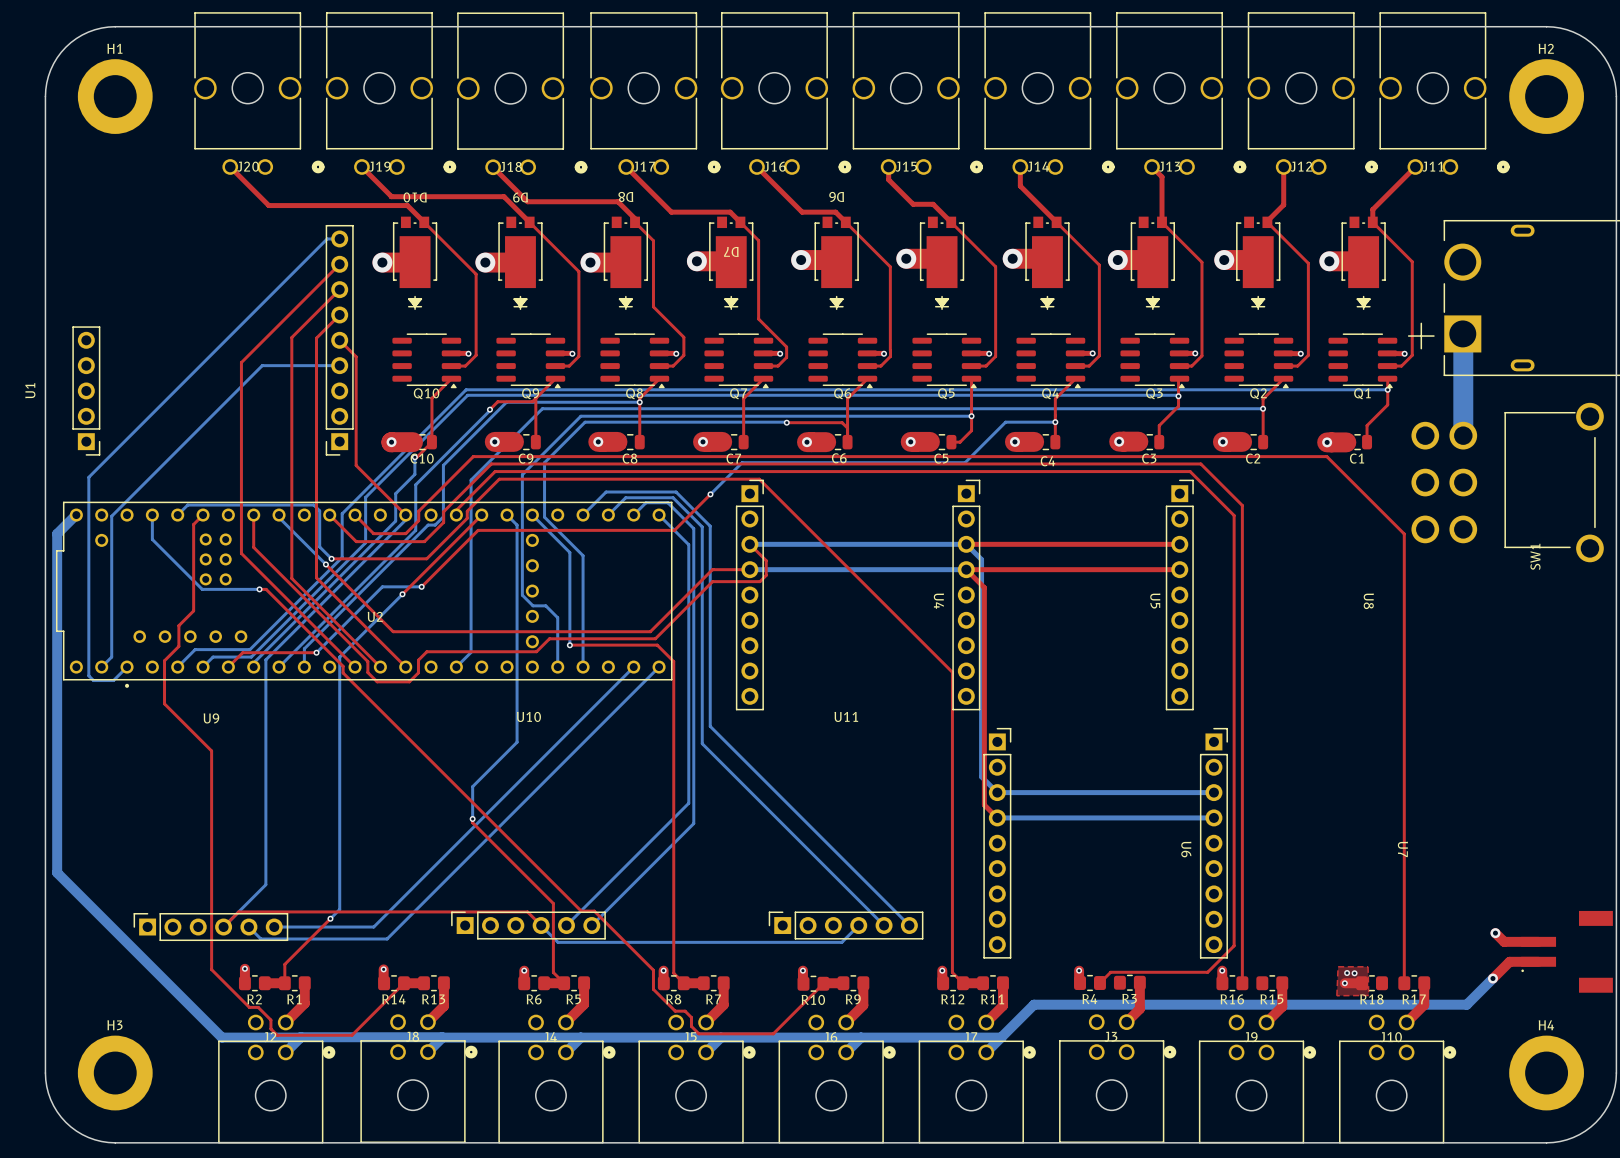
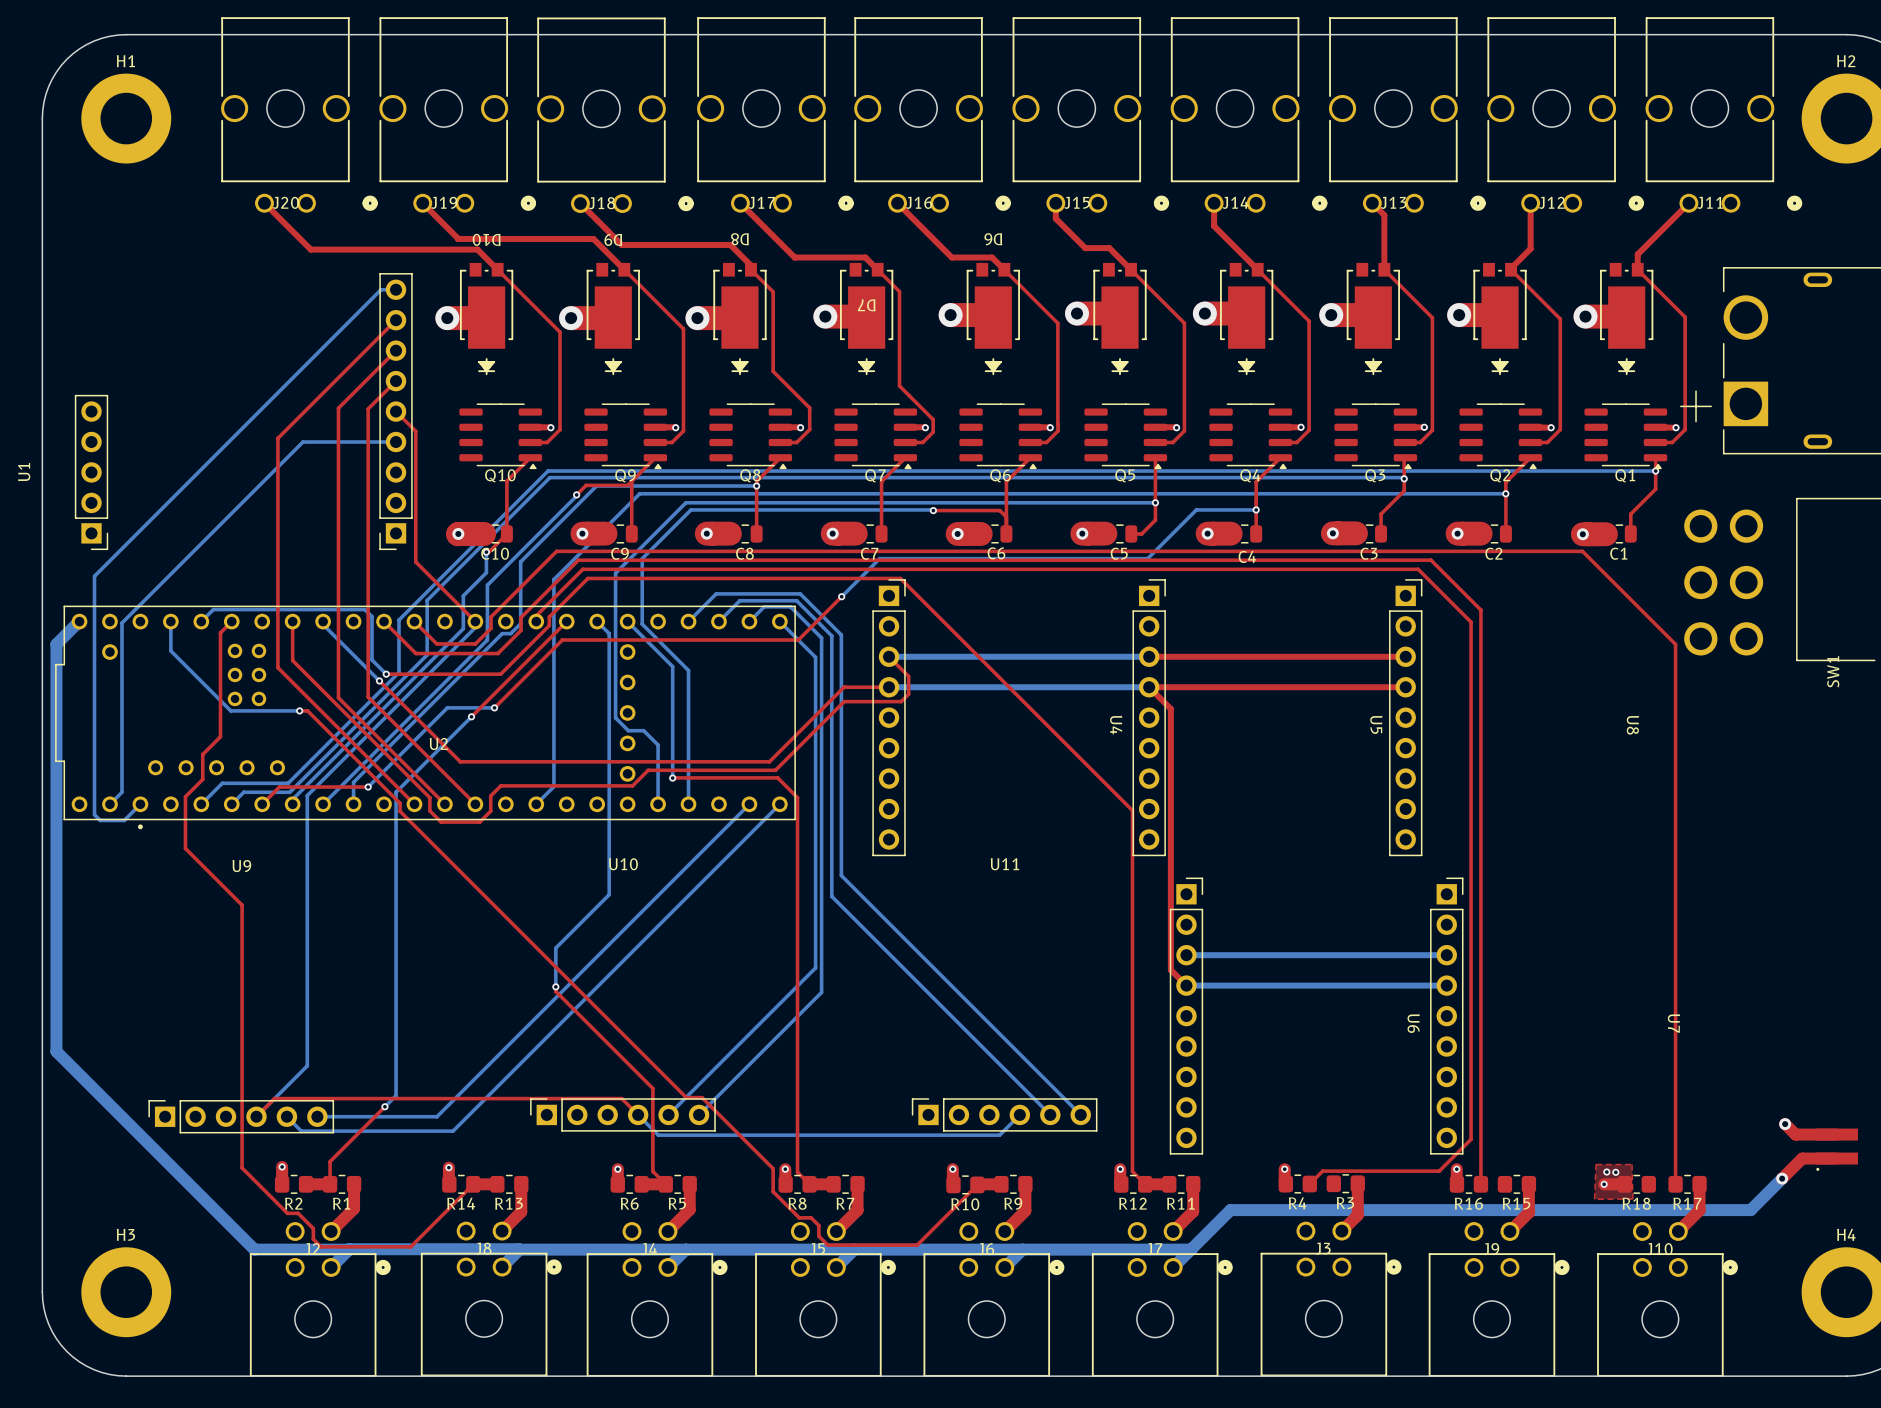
bottom track: (1462, 333) (1463, 435) -> none
bottom track: (966, 544) (981, 559) (981, 776) (997, 792) -> none

